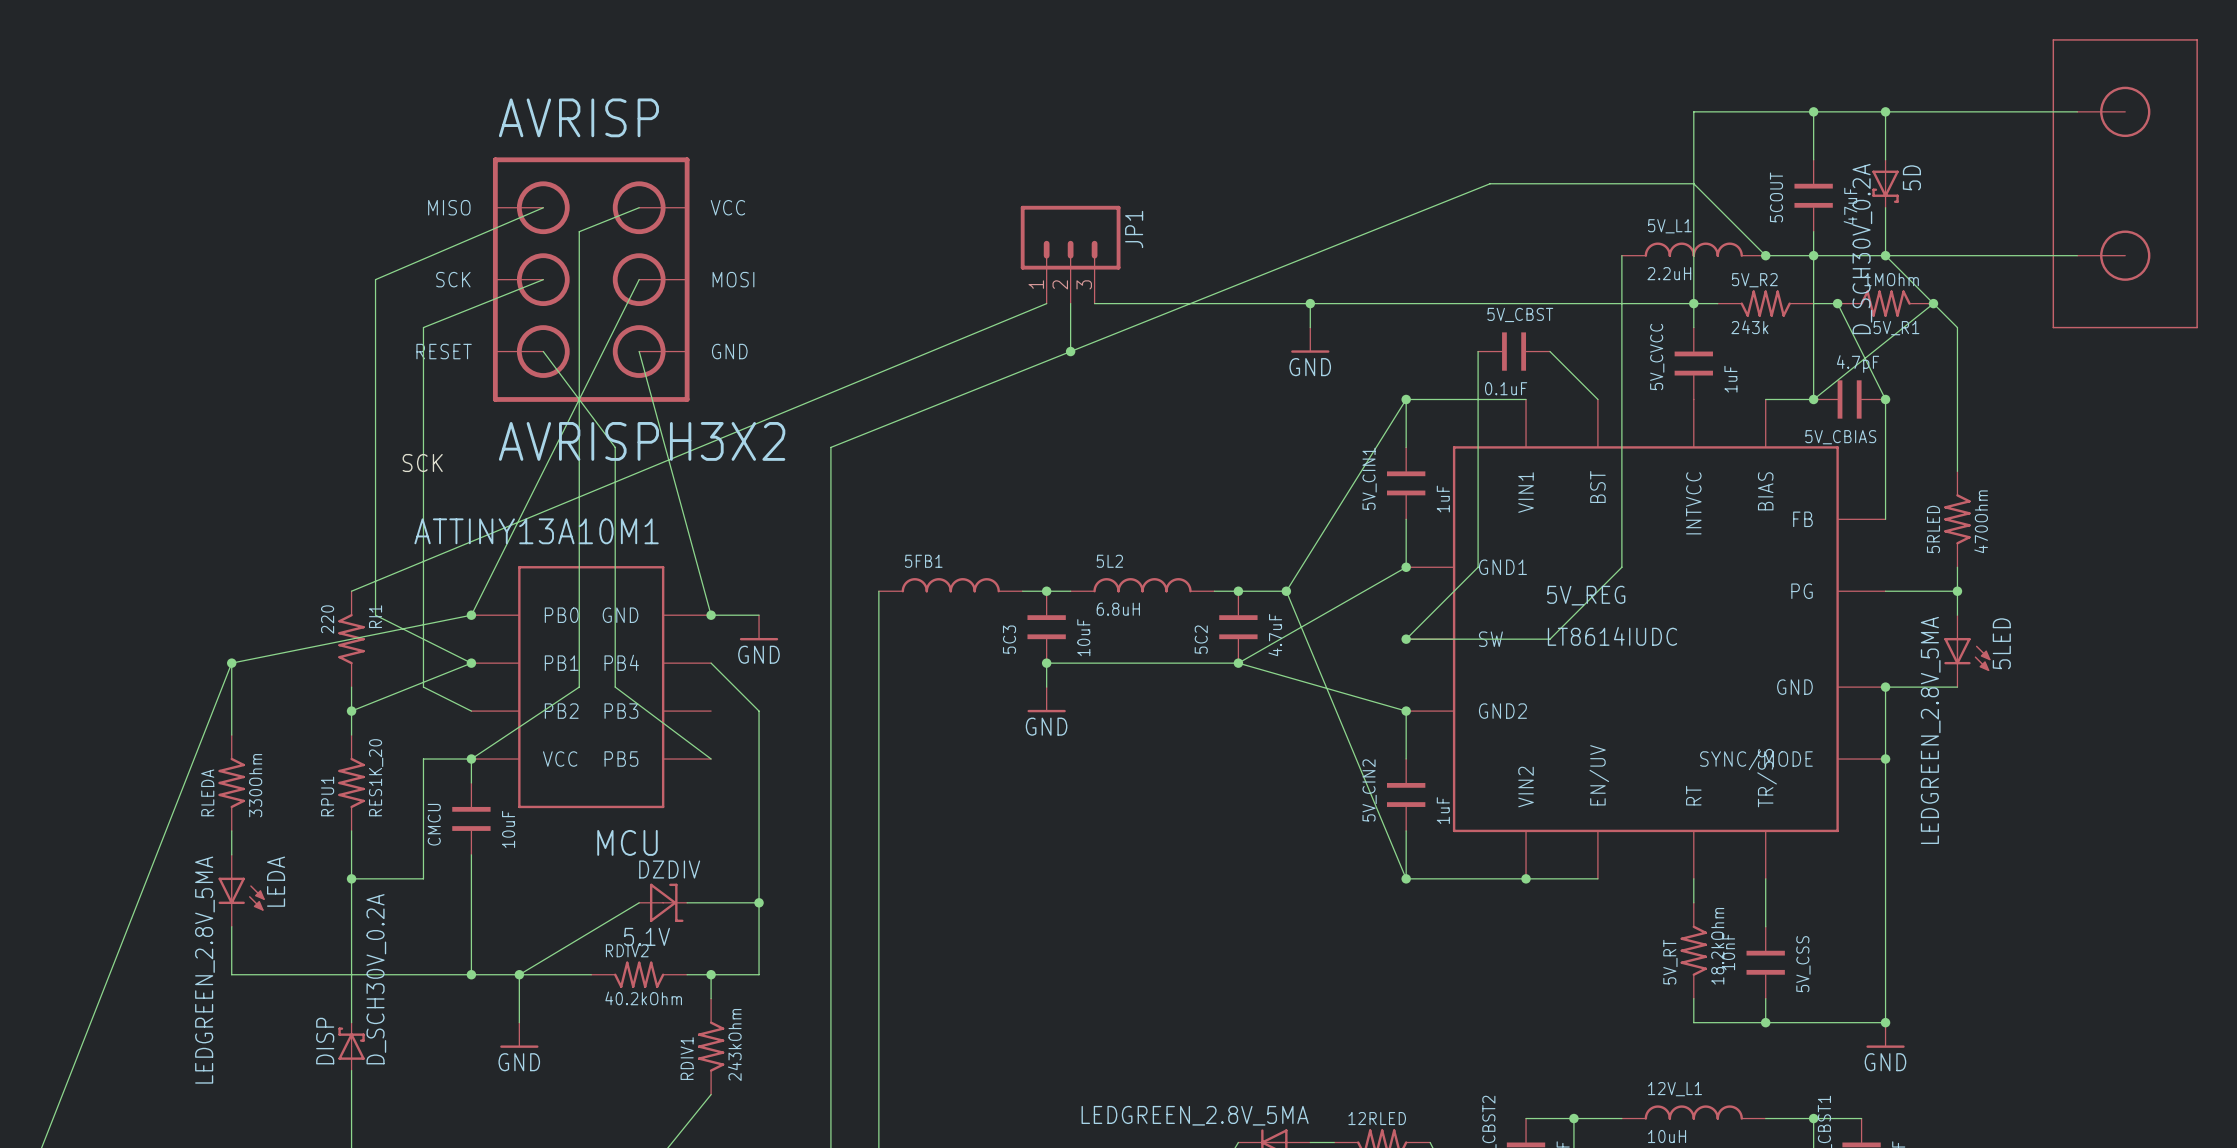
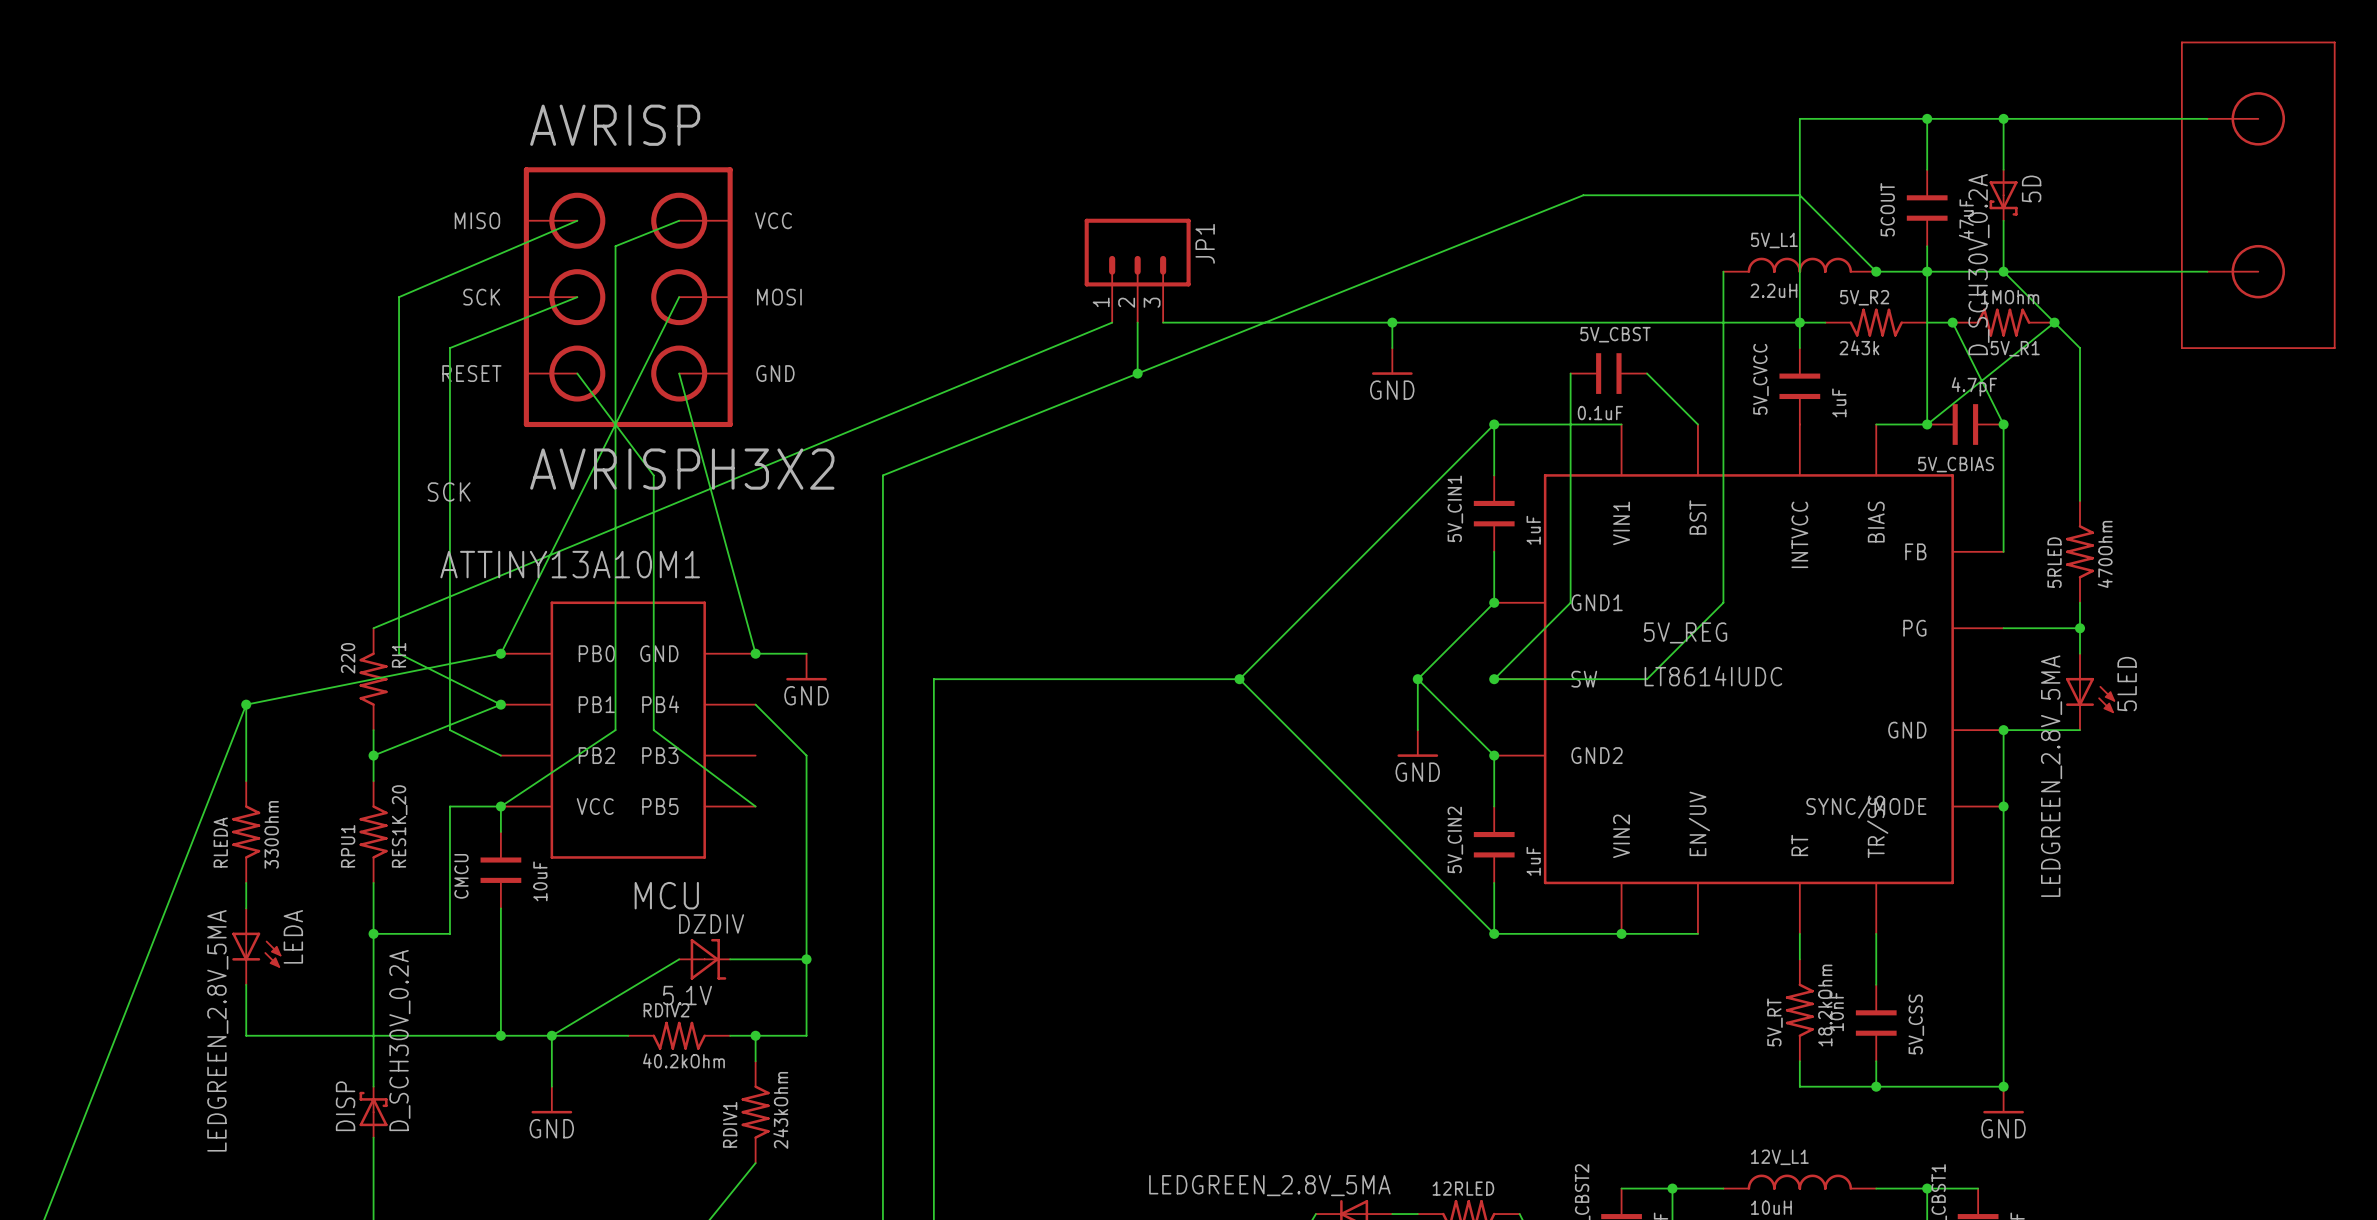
wire: (1406, 399) (1286, 591) -> (1494, 424) (1239, 679)
wire: (1406, 567) (1238, 663) -> (1494, 602) (1417, 679)
5FB1: (950, 585) -> none
5L2: 6.8uH (1142, 585) -> none
wire: (878, 591) (878, 639) -> (1239, 679) (933, 679)
wire: (1022, 591) (1070, 591) -> none
junction: (1046, 591) -> none
wire: (1214, 591) (1286, 591) -> none
junction: (1238, 591) -> none
wire: (1286, 591) (1406, 878) -> (1239, 679) (1494, 933)
junction: (1286, 591) -> none
5C3: 10uF (1046, 627) -> none
5C2: 4.7uF (1238, 627) -> none
junction: none -> (1239, 679)
wire: none -> (1417, 679) (1417, 730)
junction: none -> (1417, 679)
junction: (1046, 663) -> none
wire: (1238, 663) (1406, 711) -> (1417, 679) (1494, 755)
wire: (1238, 663) (1046, 663) (1046, 687) -> none
junction: (1238, 663) -> none
power symbol: GND (1046, 699) -> none
power symbol: none -> GND (1417, 743)

